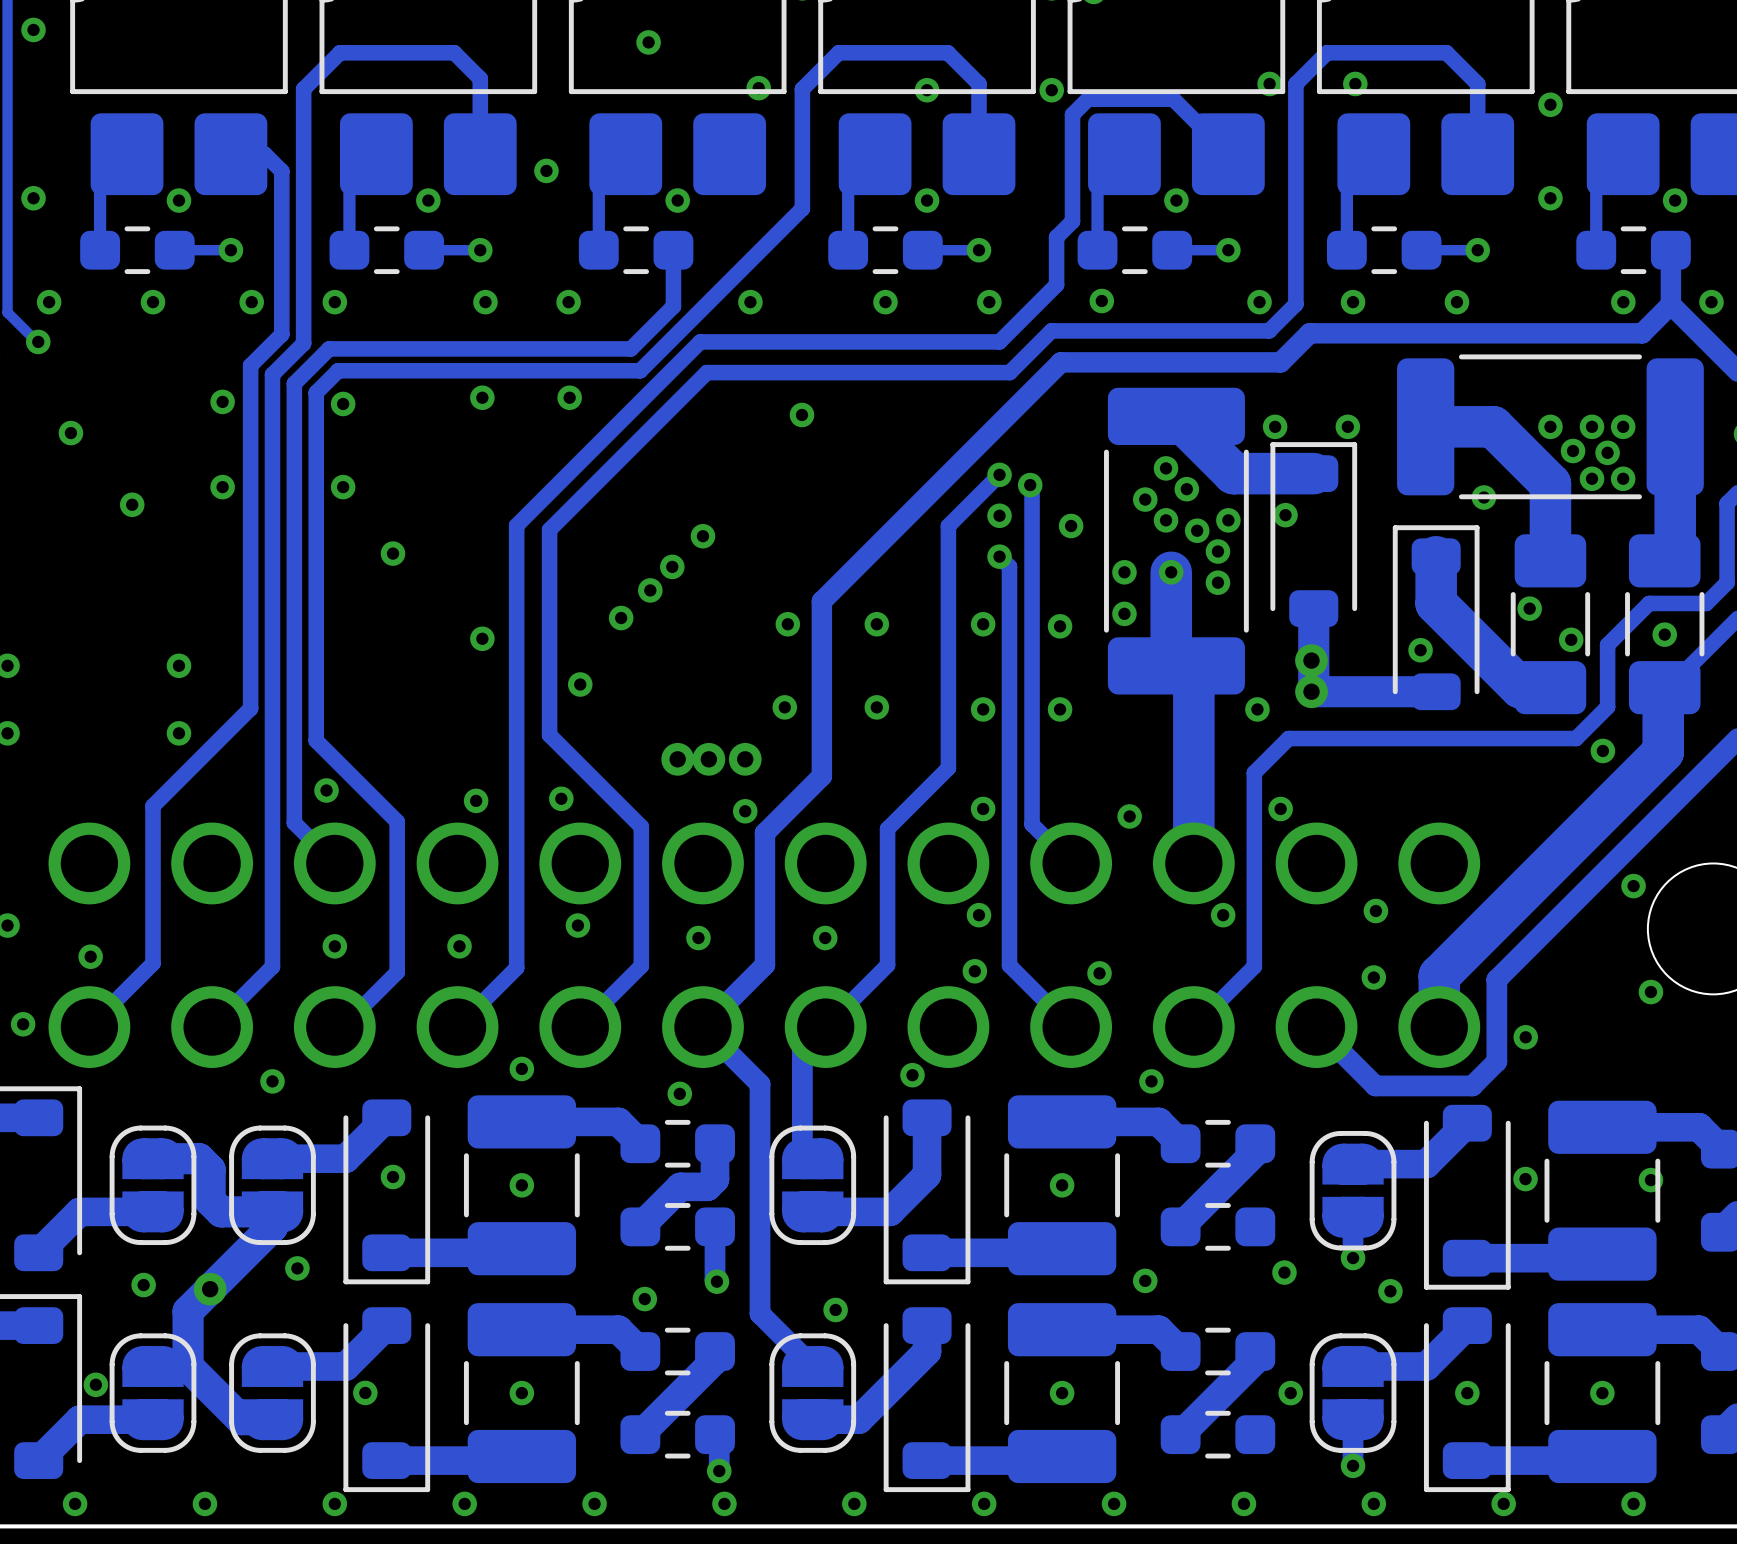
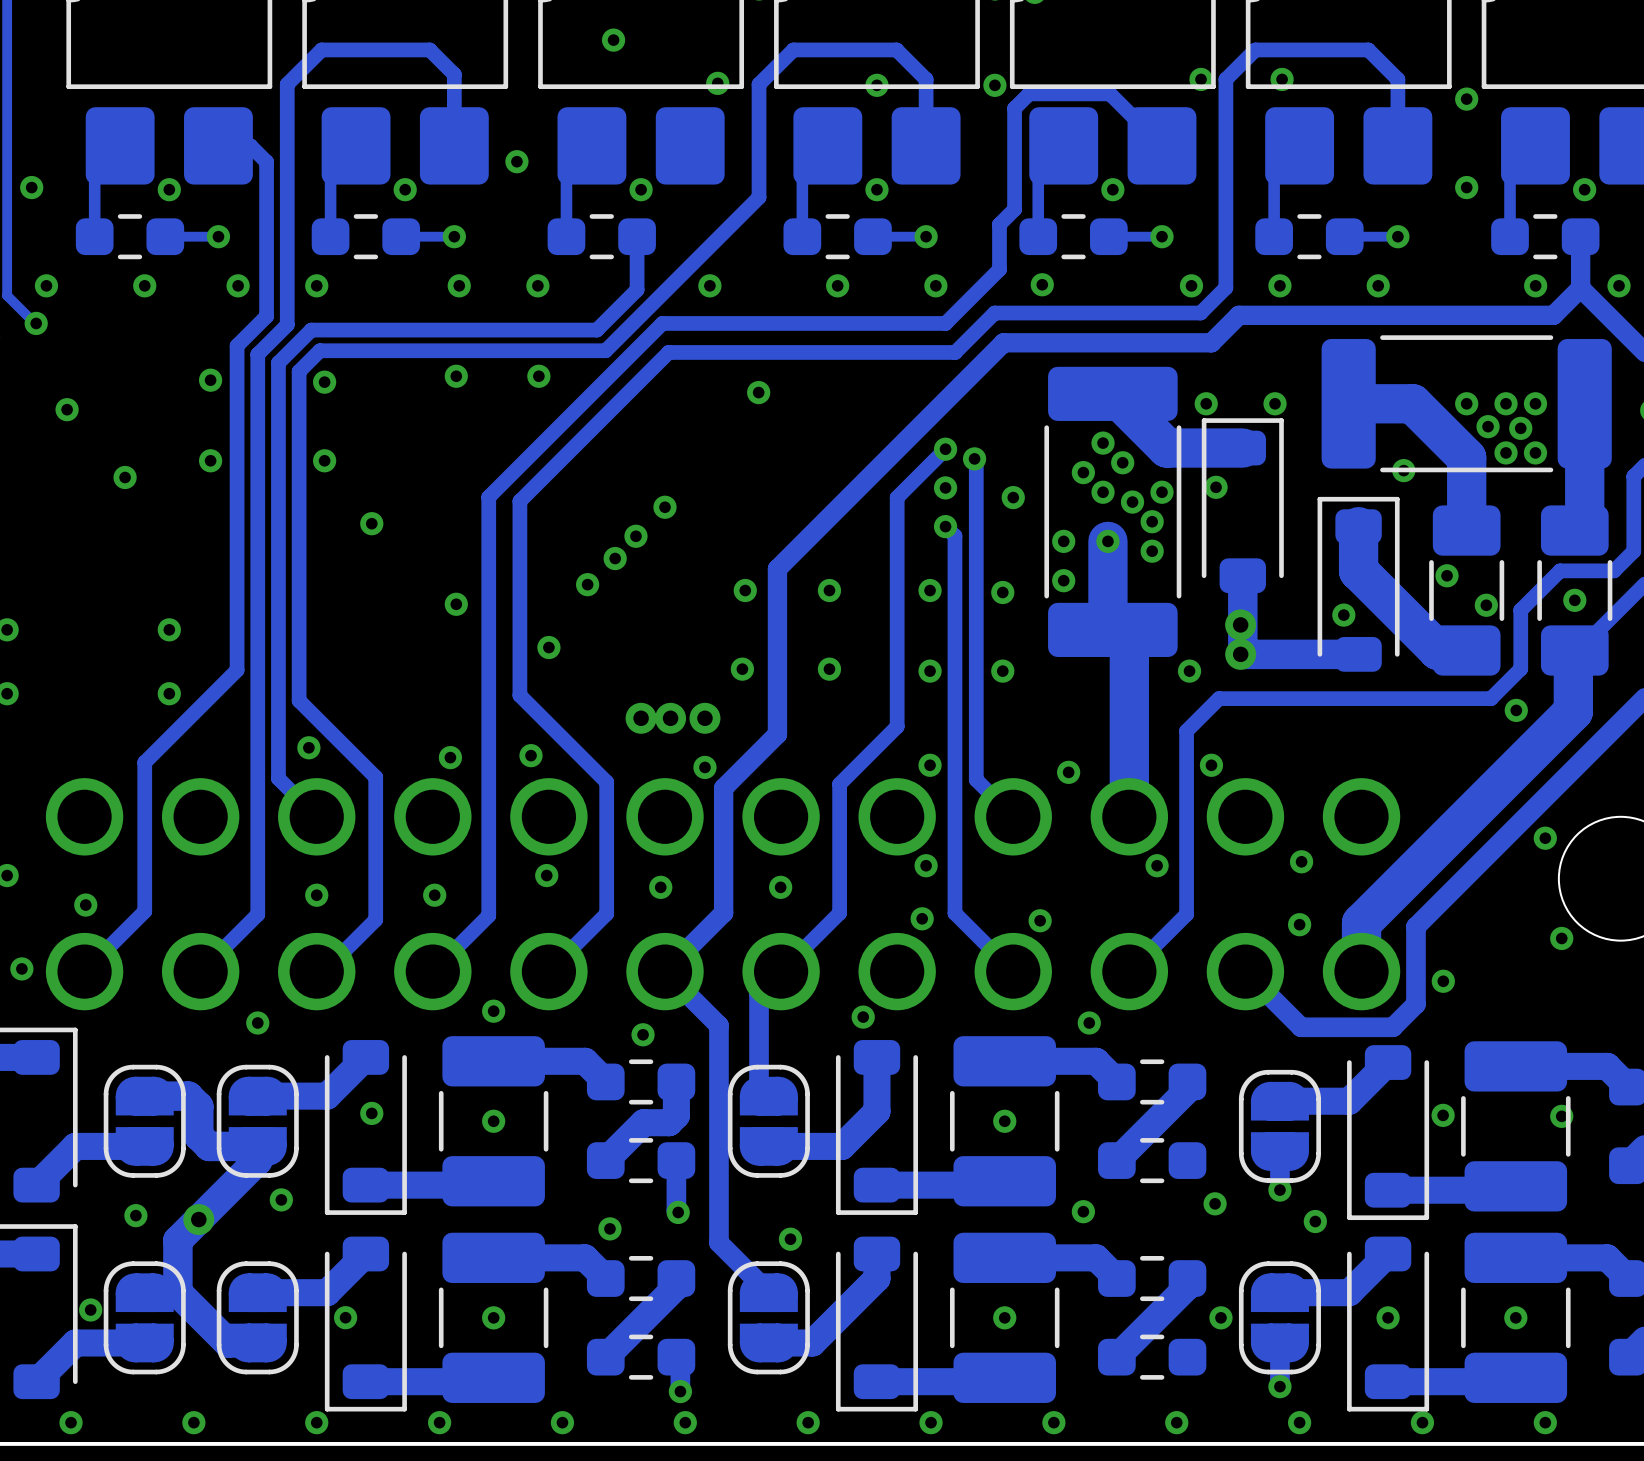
via: (33, 29) -> none

